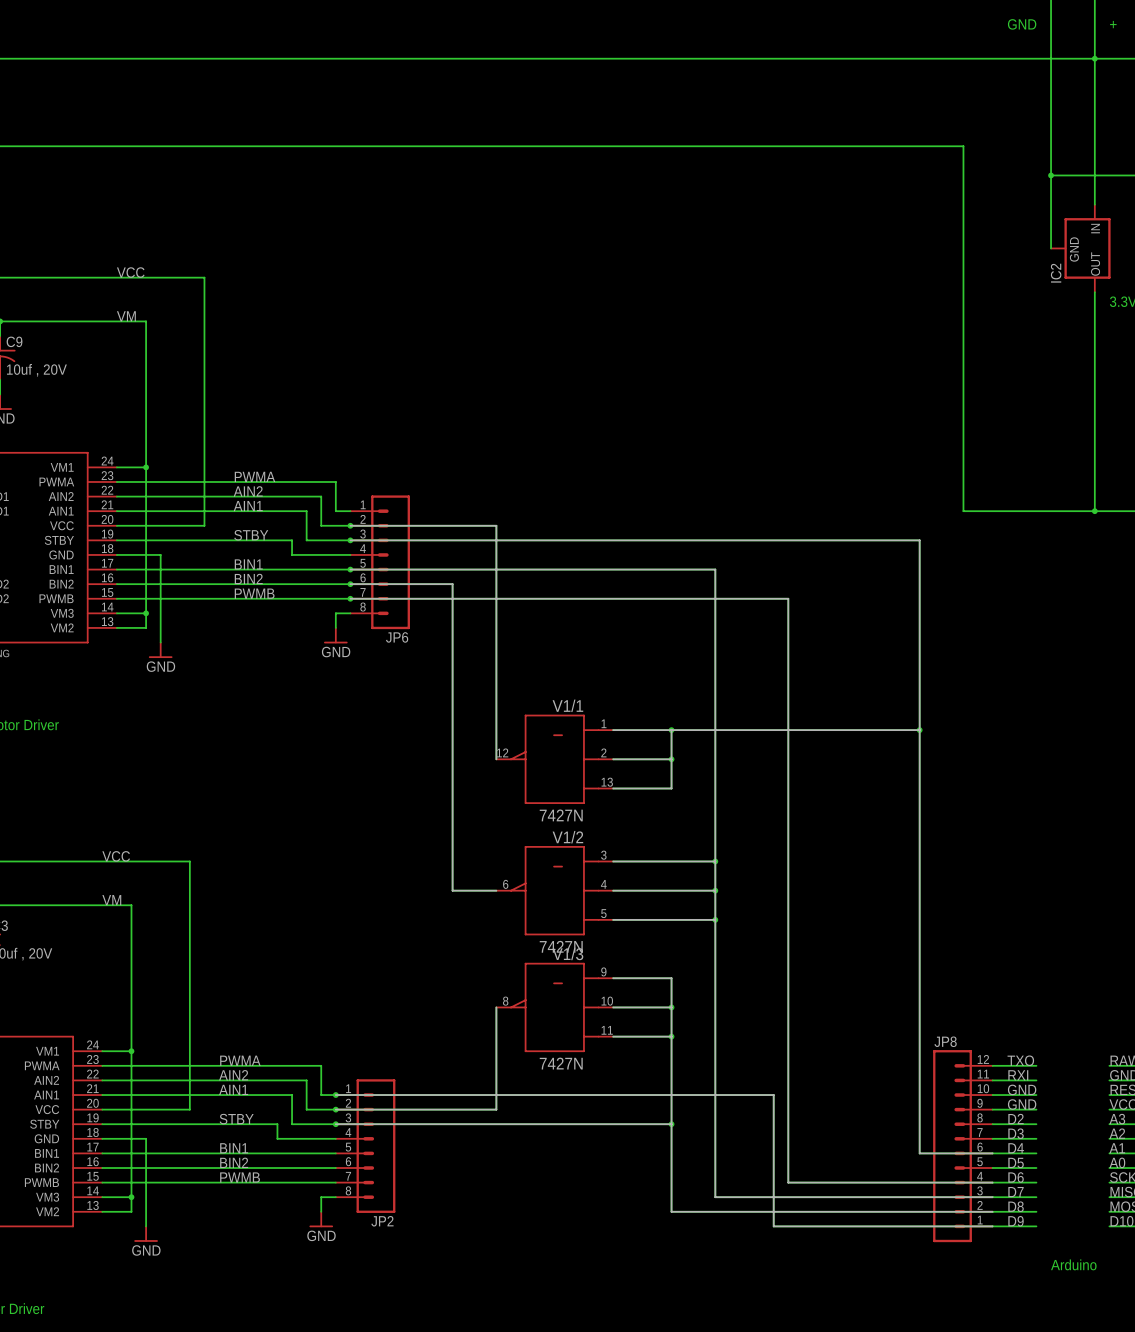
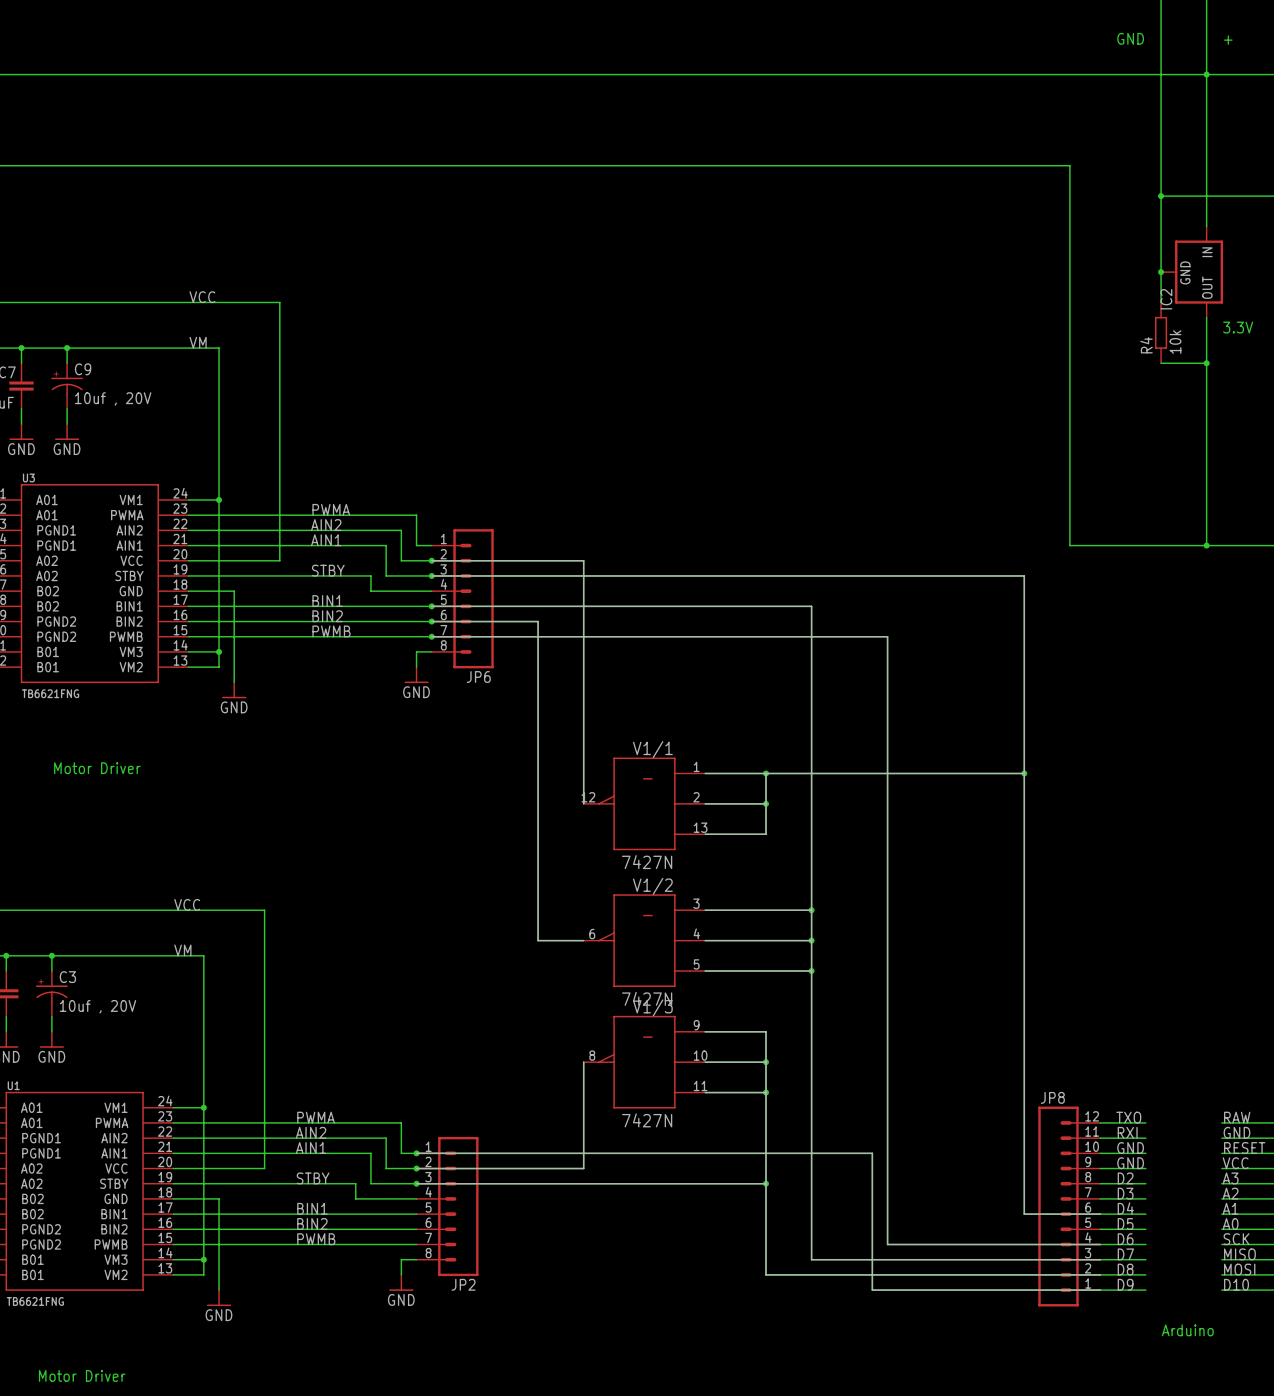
wire: none -> (1161, 272) (1161, 302)
junction: none -> (1161, 272)
R4: none -> 10k (1161, 332)
wire: none -> (1161, 363) (1206, 363)
junction: none -> (1206, 363)

